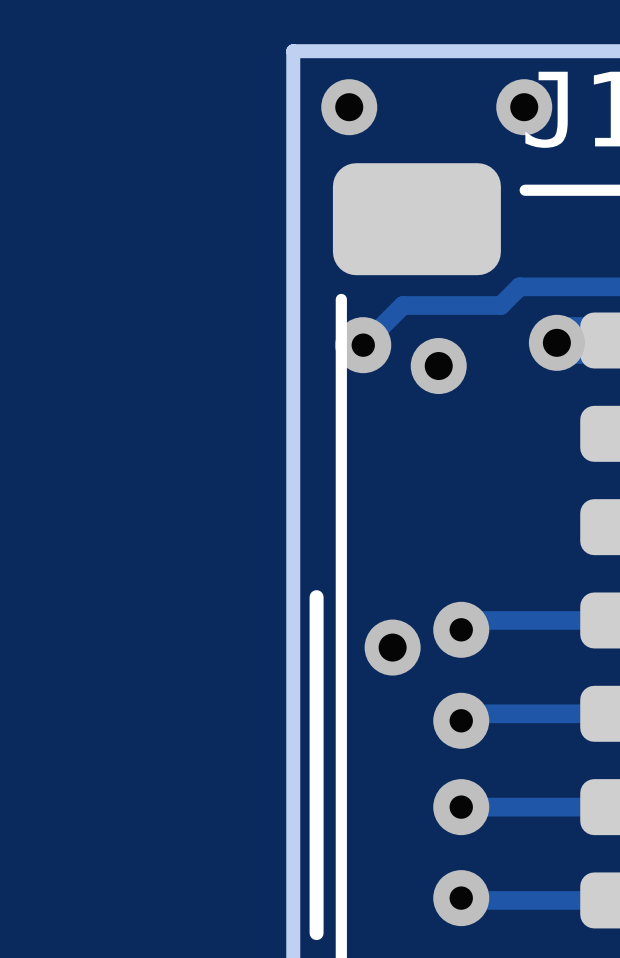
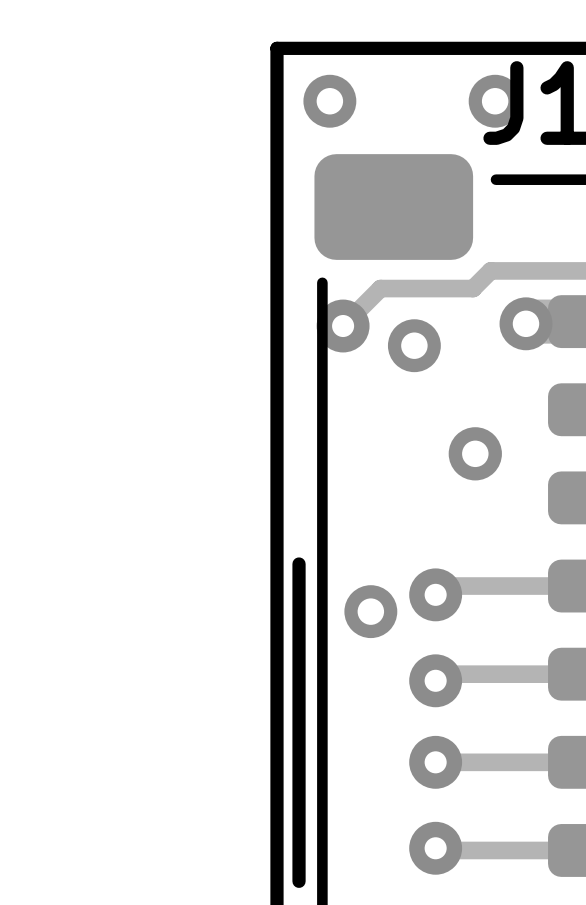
via: none -> (475, 453)

